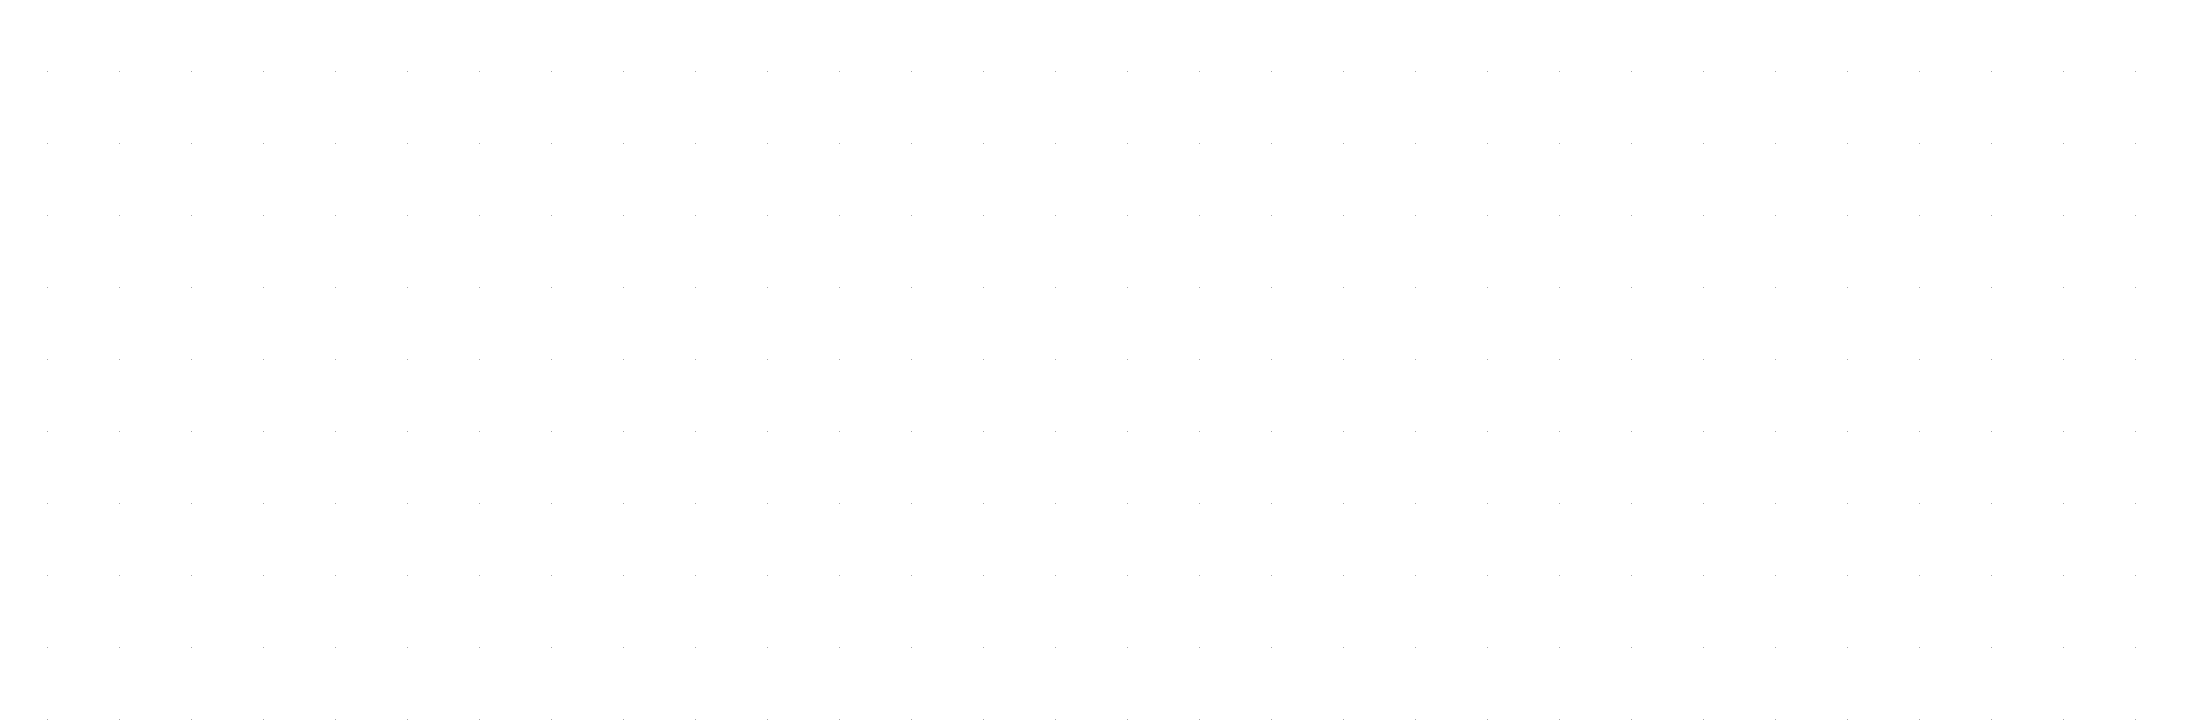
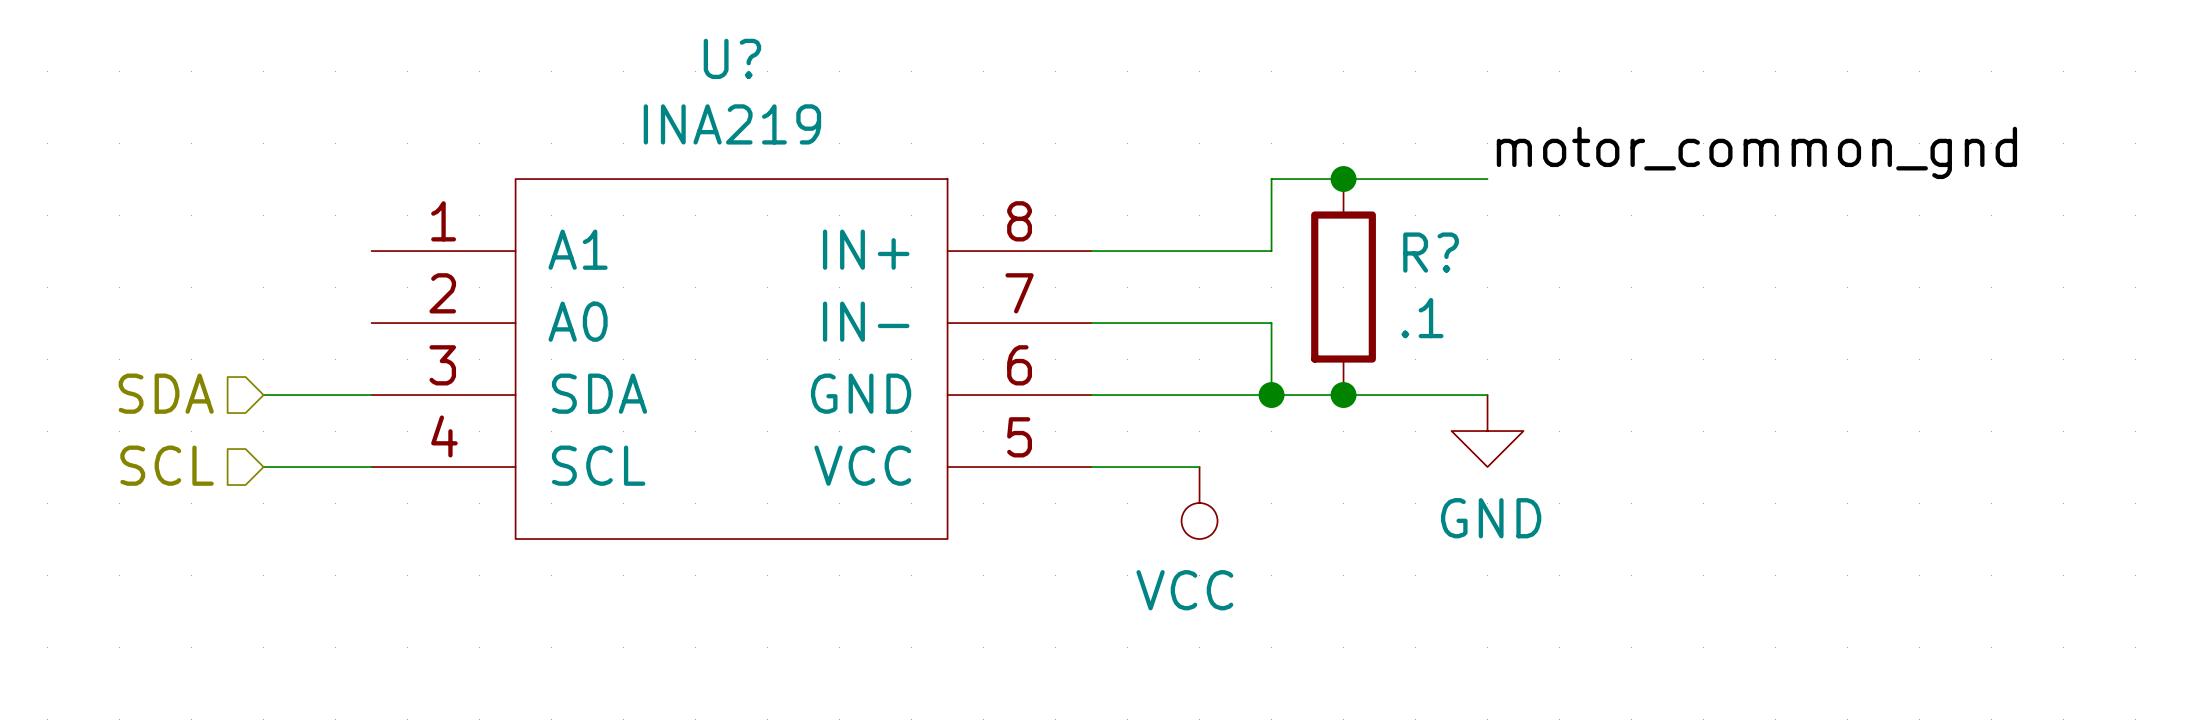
label: none -> motor_common_gnd (1756, 152)
junction: none -> (1343, 179)
wire: none -> (1487, 179) (1271, 179) (1271, 251) (1091, 251)
R?: none -> .1 (1343, 287)
wire: none -> (1091, 323) (1271, 323) (1271, 395)
U?: none -> INA219 (731, 359)
hierarchical label: none -> SDA (166, 393)
wire: none -> (263, 395) (371, 395)
wire: none -> (1091, 395) (1487, 395)
junction: none -> (1271, 395)
junction: none -> (1343, 395)
power symbol: none -> GND (1487, 431)
hierarchical label: none -> SCL (167, 465)
wire: none -> (263, 467) (371, 467)
wire: none -> (1091, 467) (1199, 467)
power symbol: none -> VCC (1199, 503)

